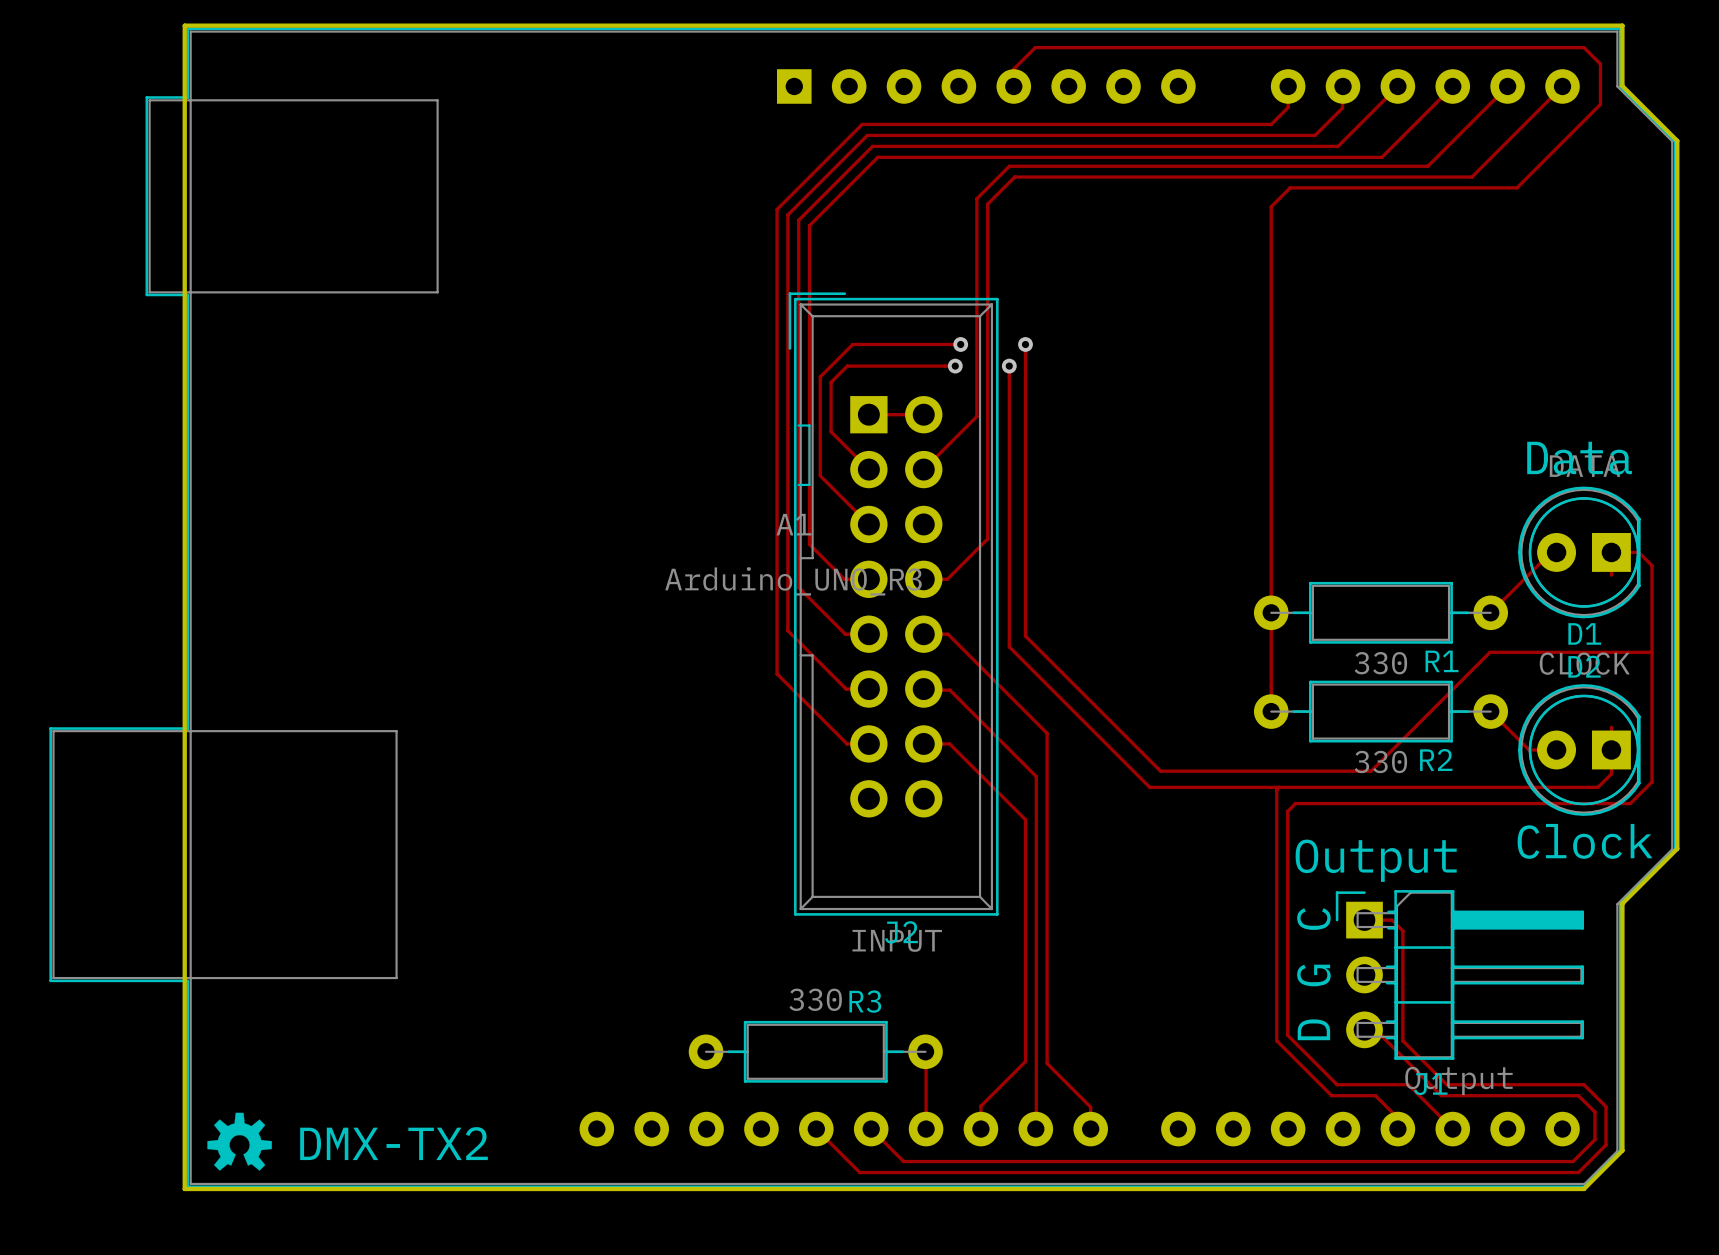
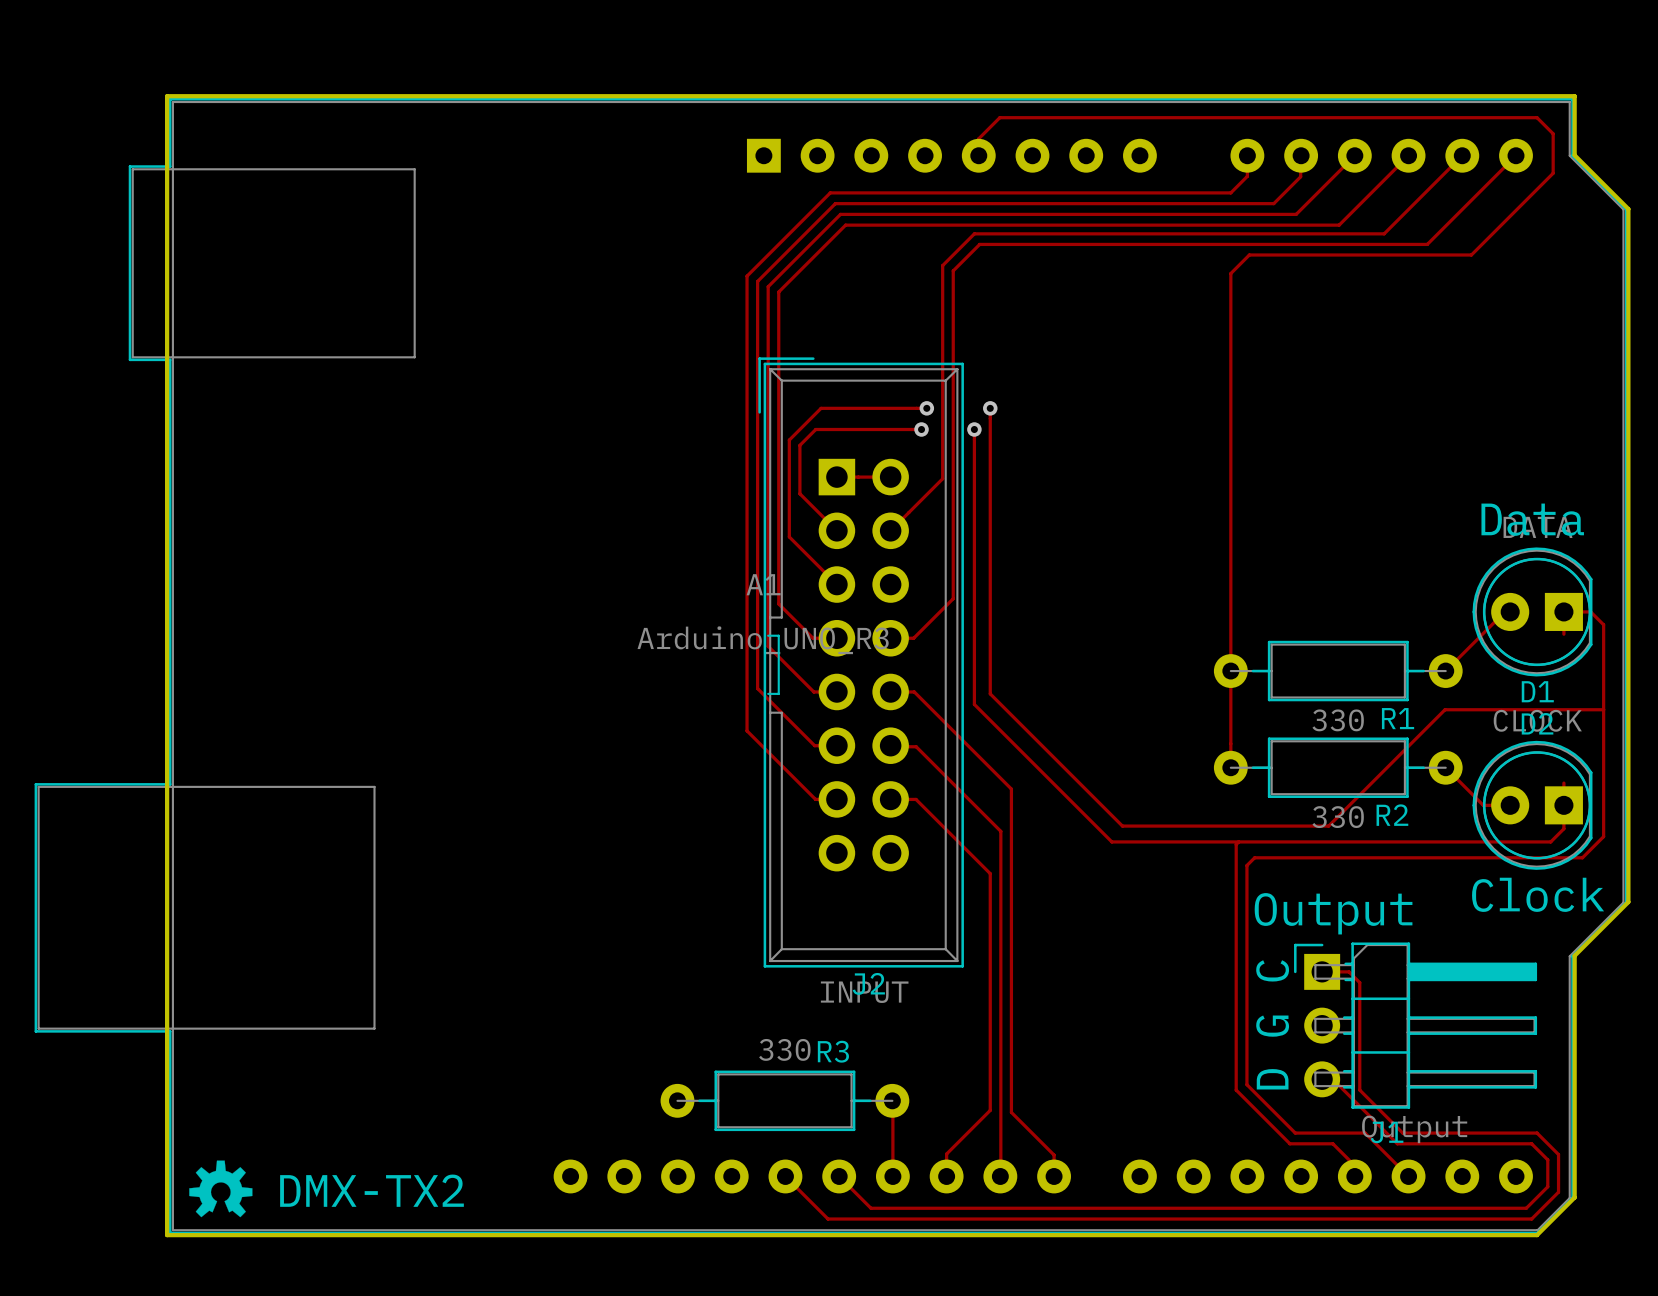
line: (798, 425) (809, 425) (809, 484) (798, 484) -> (768, 635) (778, 635) (778, 693) (768, 693)

